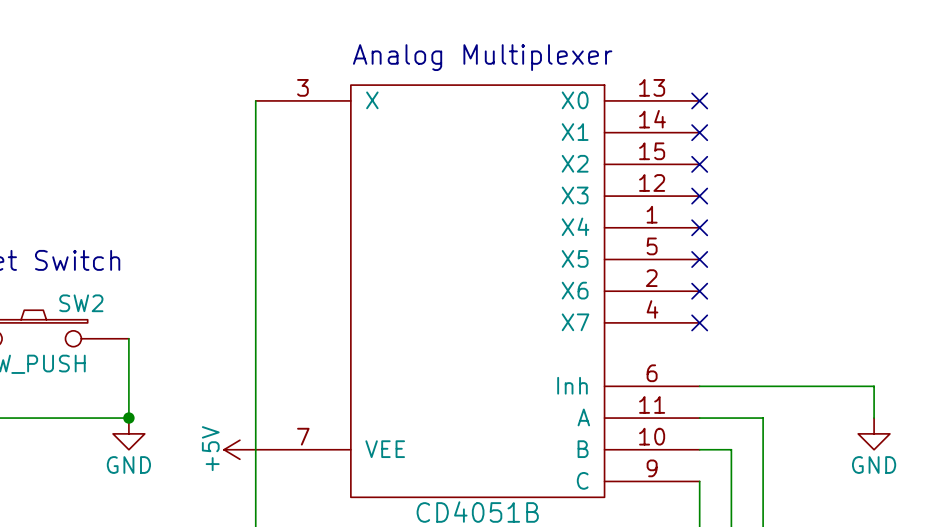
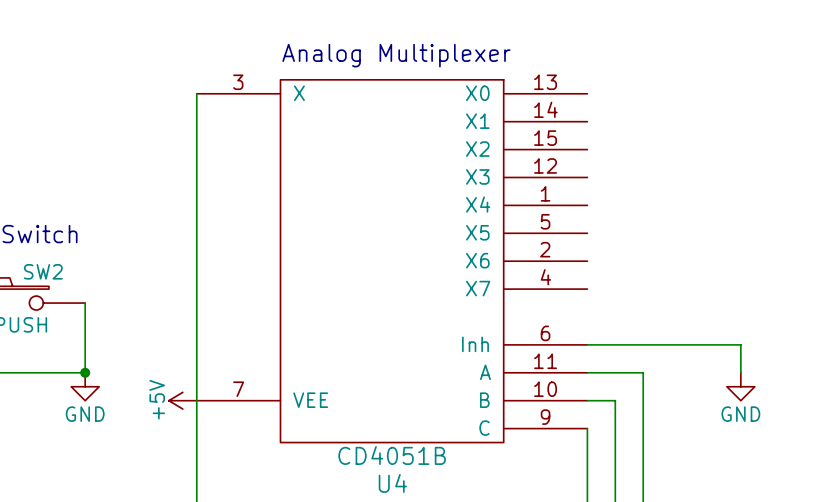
no-connect mark: (699, 100) -> none
no-connect mark: (699, 132) -> none
no-connect mark: (699, 164) -> none
no-connect mark: (699, 196) -> none
no-connect mark: (699, 227) -> none
no-connect mark: (699, 259) -> none
no-connect mark: (699, 291) -> none
no-connect mark: (699, 322) -> none

